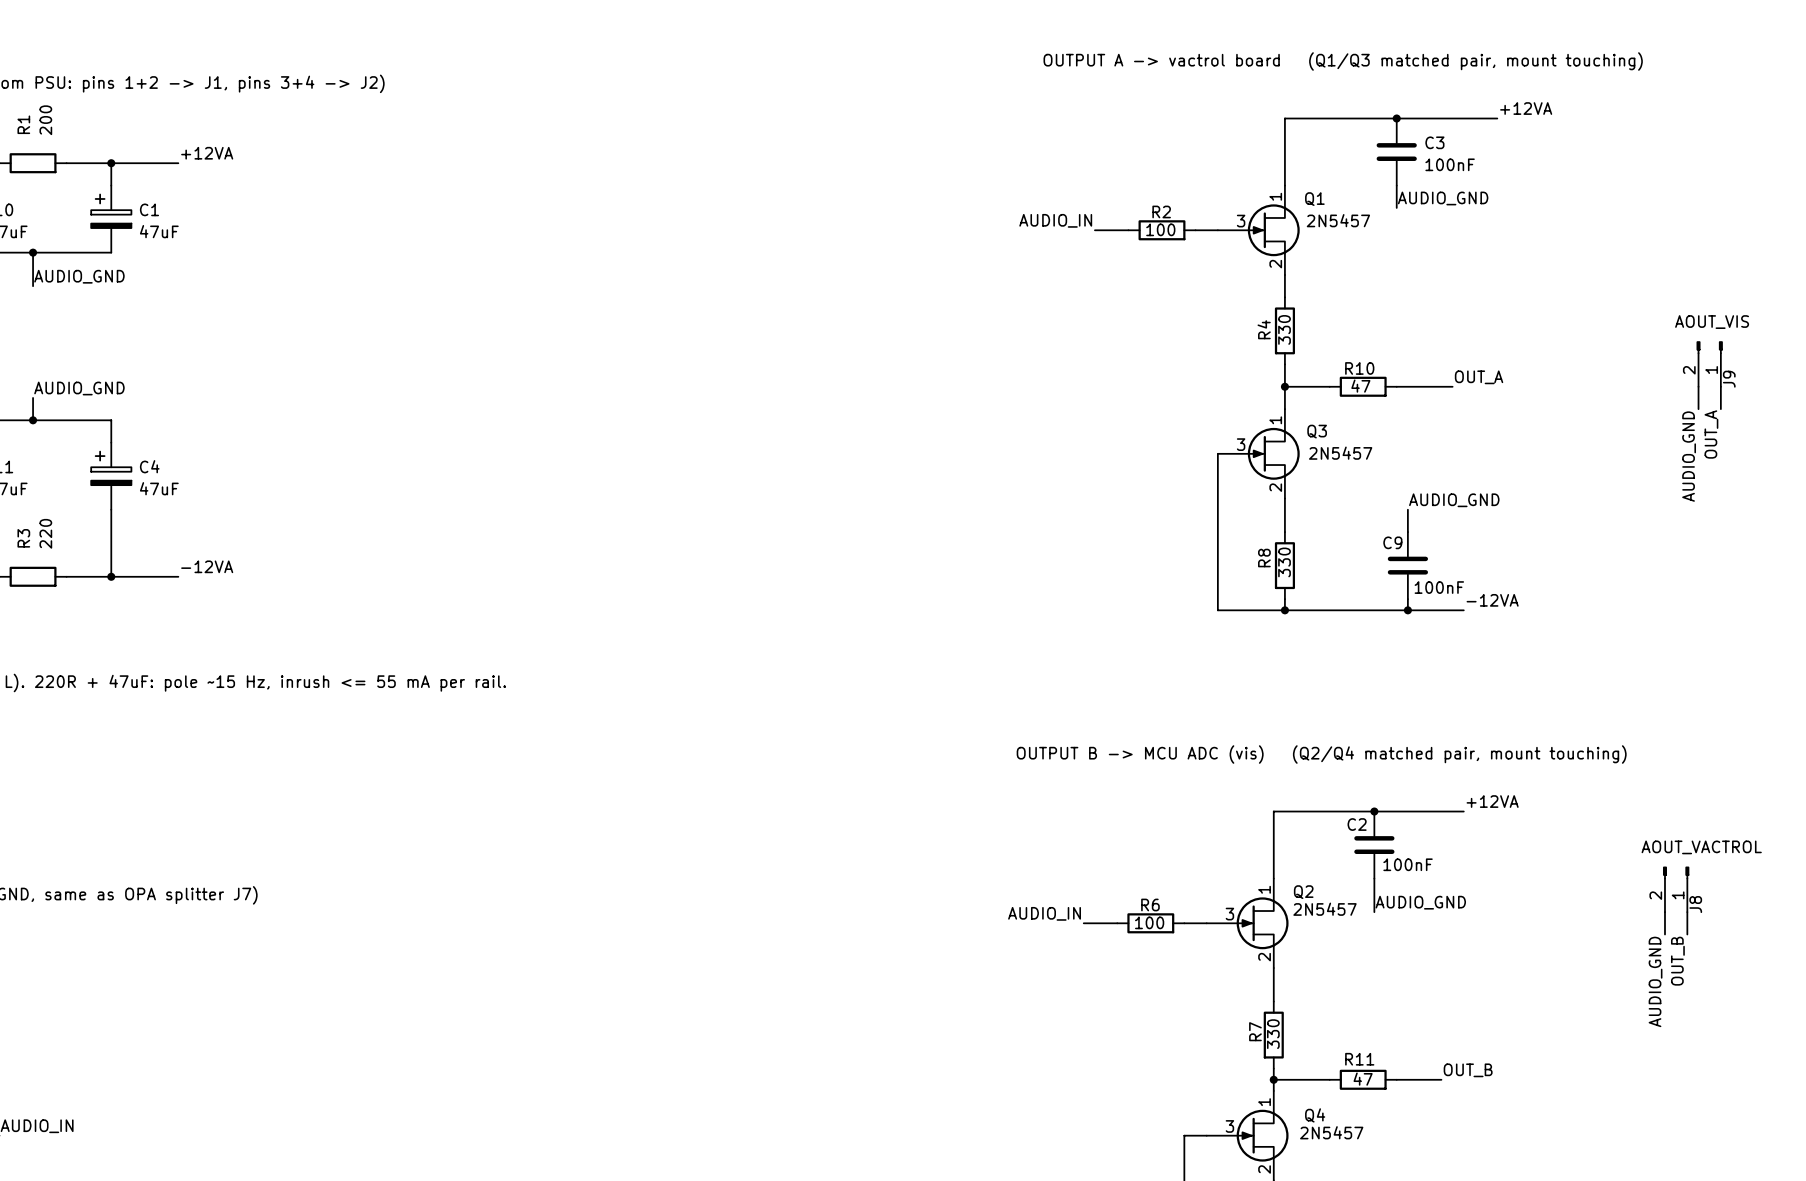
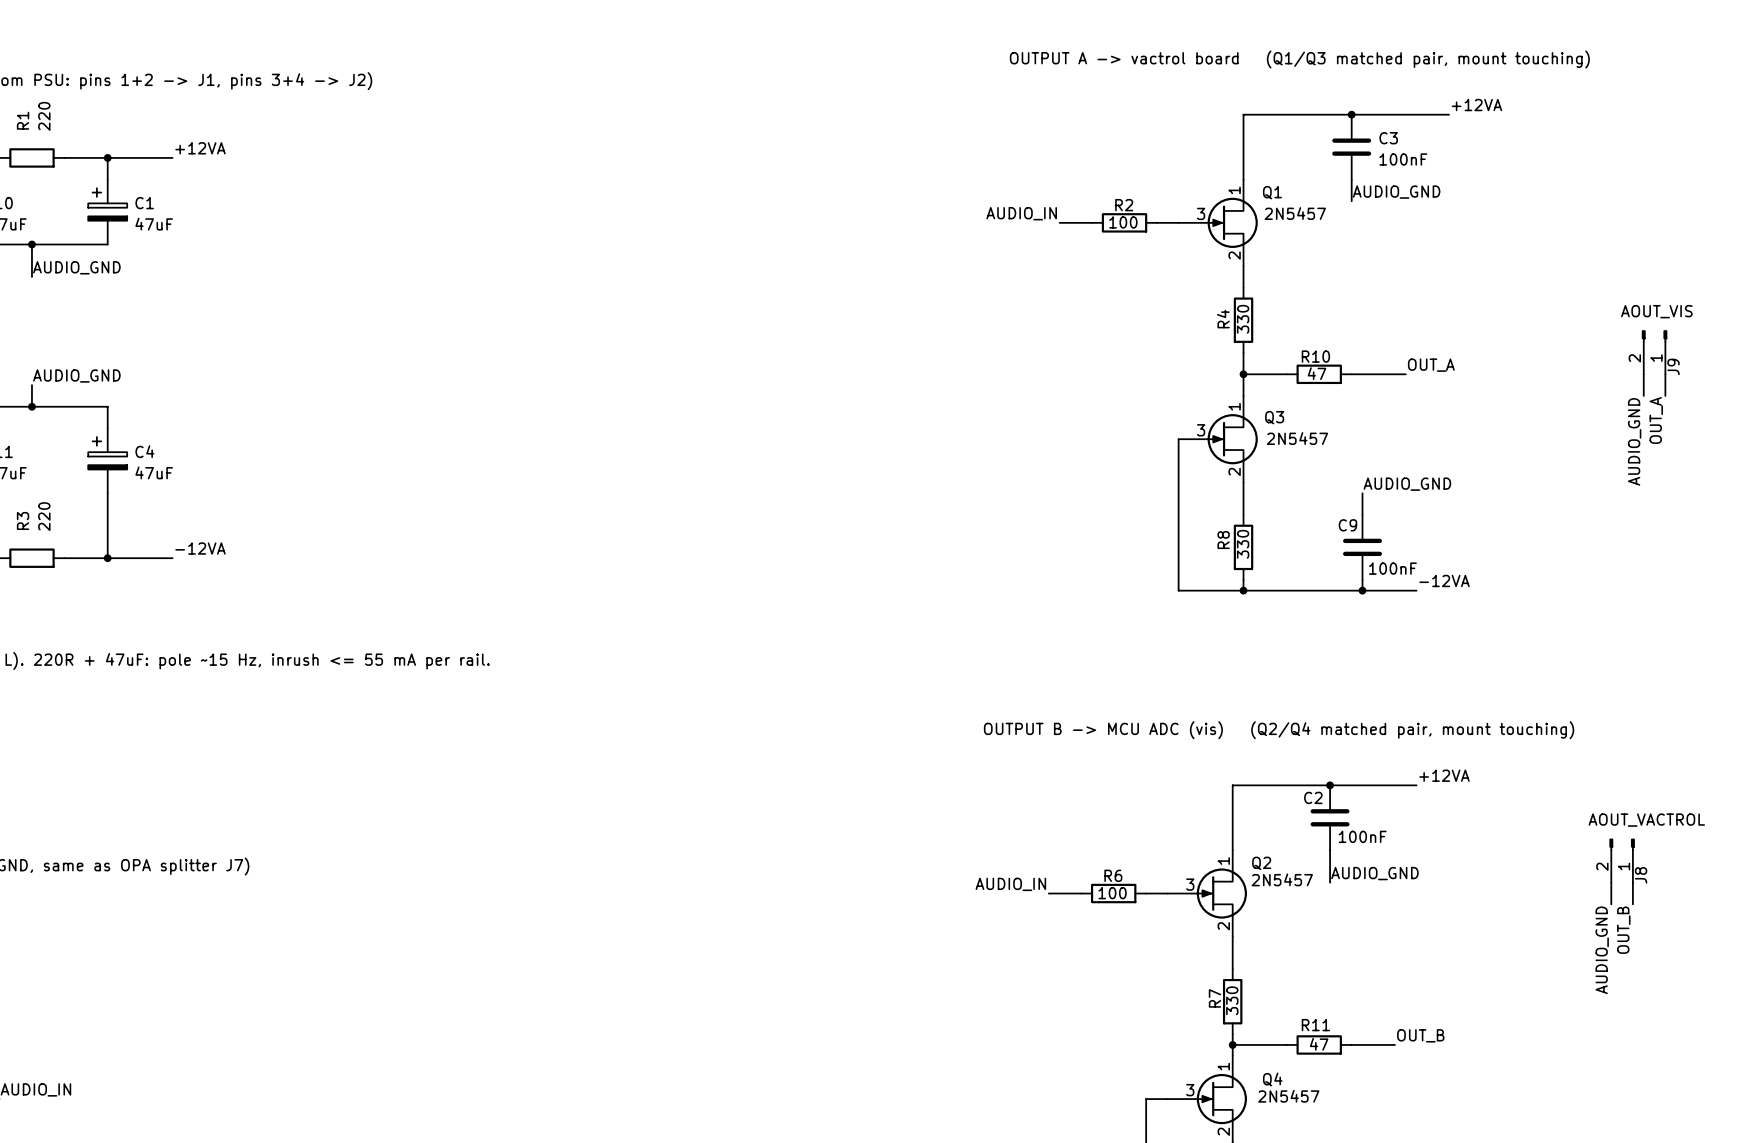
R1 value: 200 (45, 120) -> 220 (44, 116)

